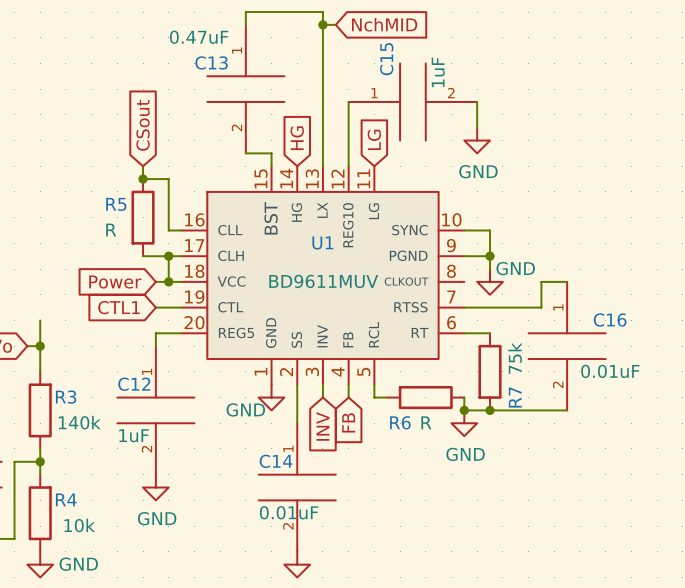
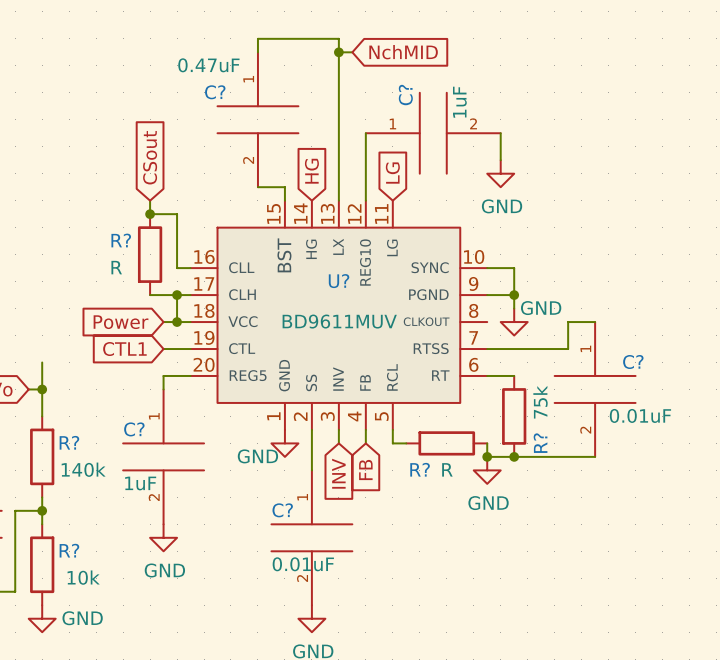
C15 name: C15 (386, 59) -> C? (405, 95)
C13 name: C13 (211, 62) -> C? (215, 92)
R5 name: R5 (116, 204) -> R? (121, 240)
U1 name: U1 (322, 242) -> U? (339, 281)
C16 name: C16 (610, 319) -> C? (633, 362)
C12 name: C12 (134, 384) -> C? (134, 429)
R3 name: R3 (66, 397) -> R? (69, 442)
R7 name: R7 (515, 397) -> R? (540, 443)
R6 name: R6 (400, 422) -> R? (420, 469)
C14 name: C14 (276, 461) -> C? (282, 510)
R4 name: R4 (66, 499) -> R? (69, 550)

